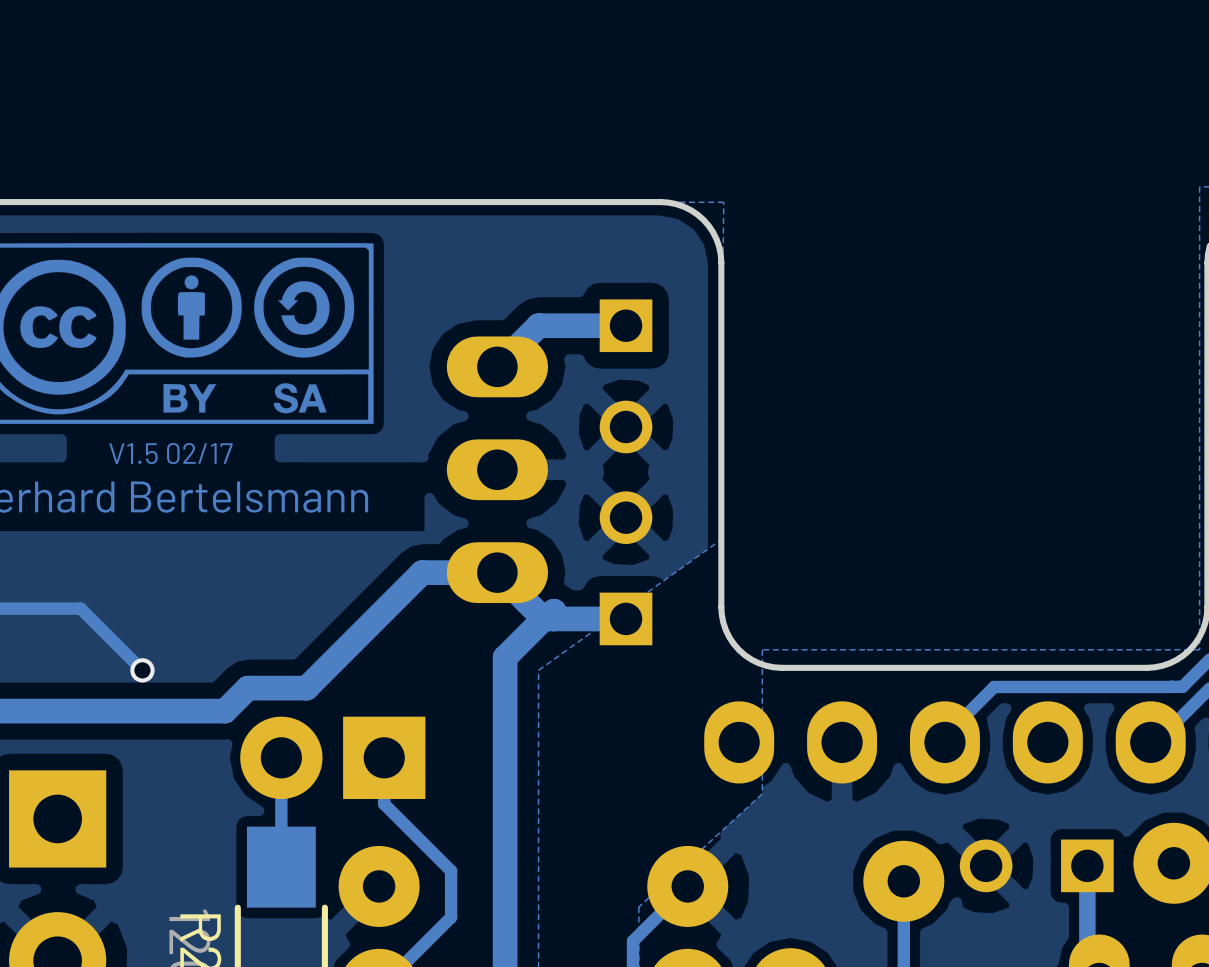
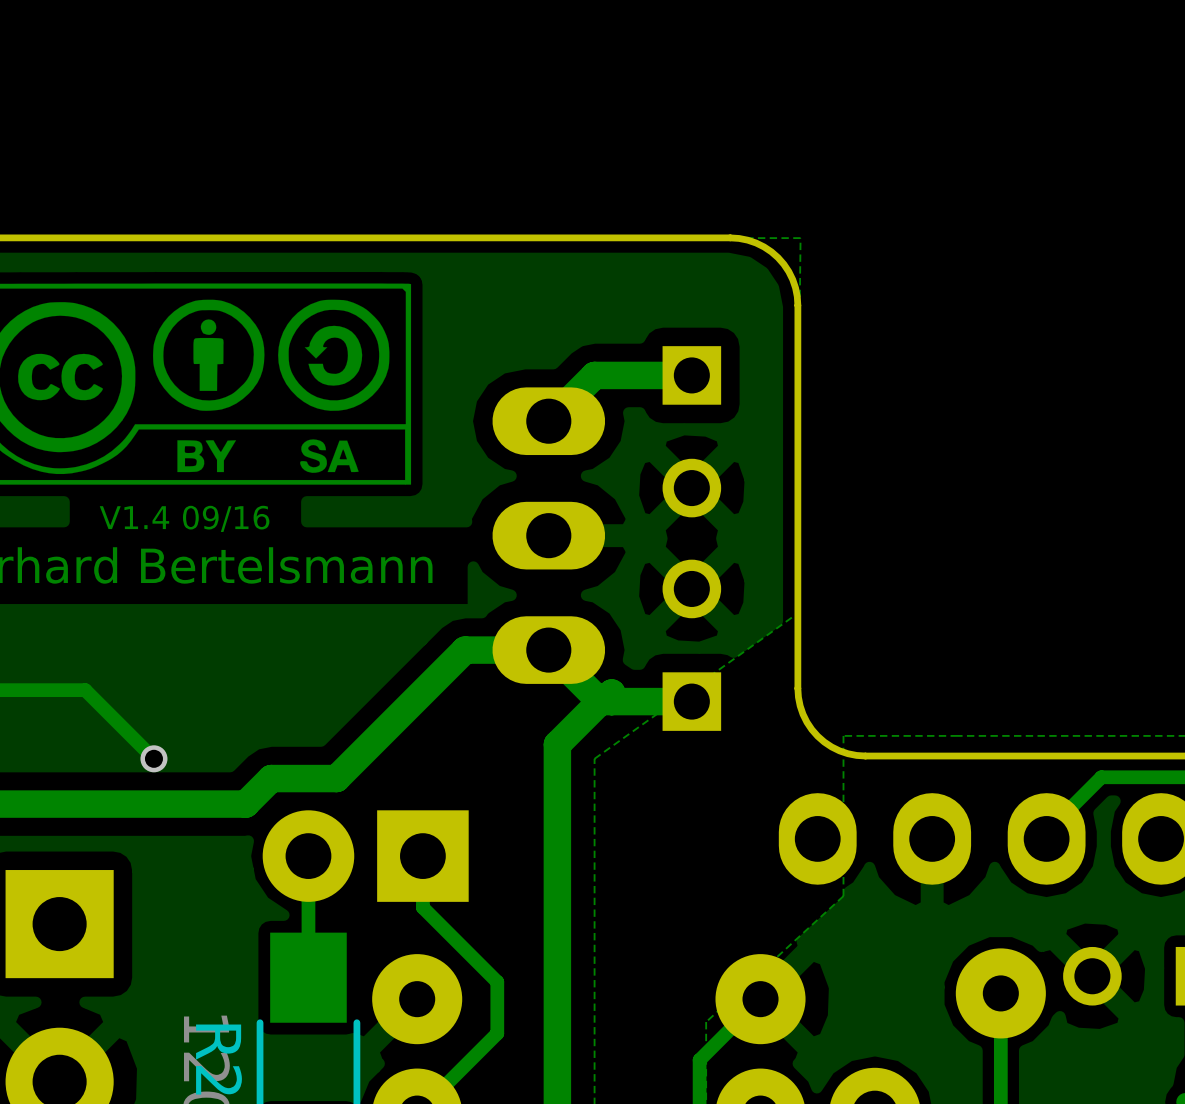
text: V1.5 02/17 (170, 453) -> V1.4 09/16 (184, 518)

